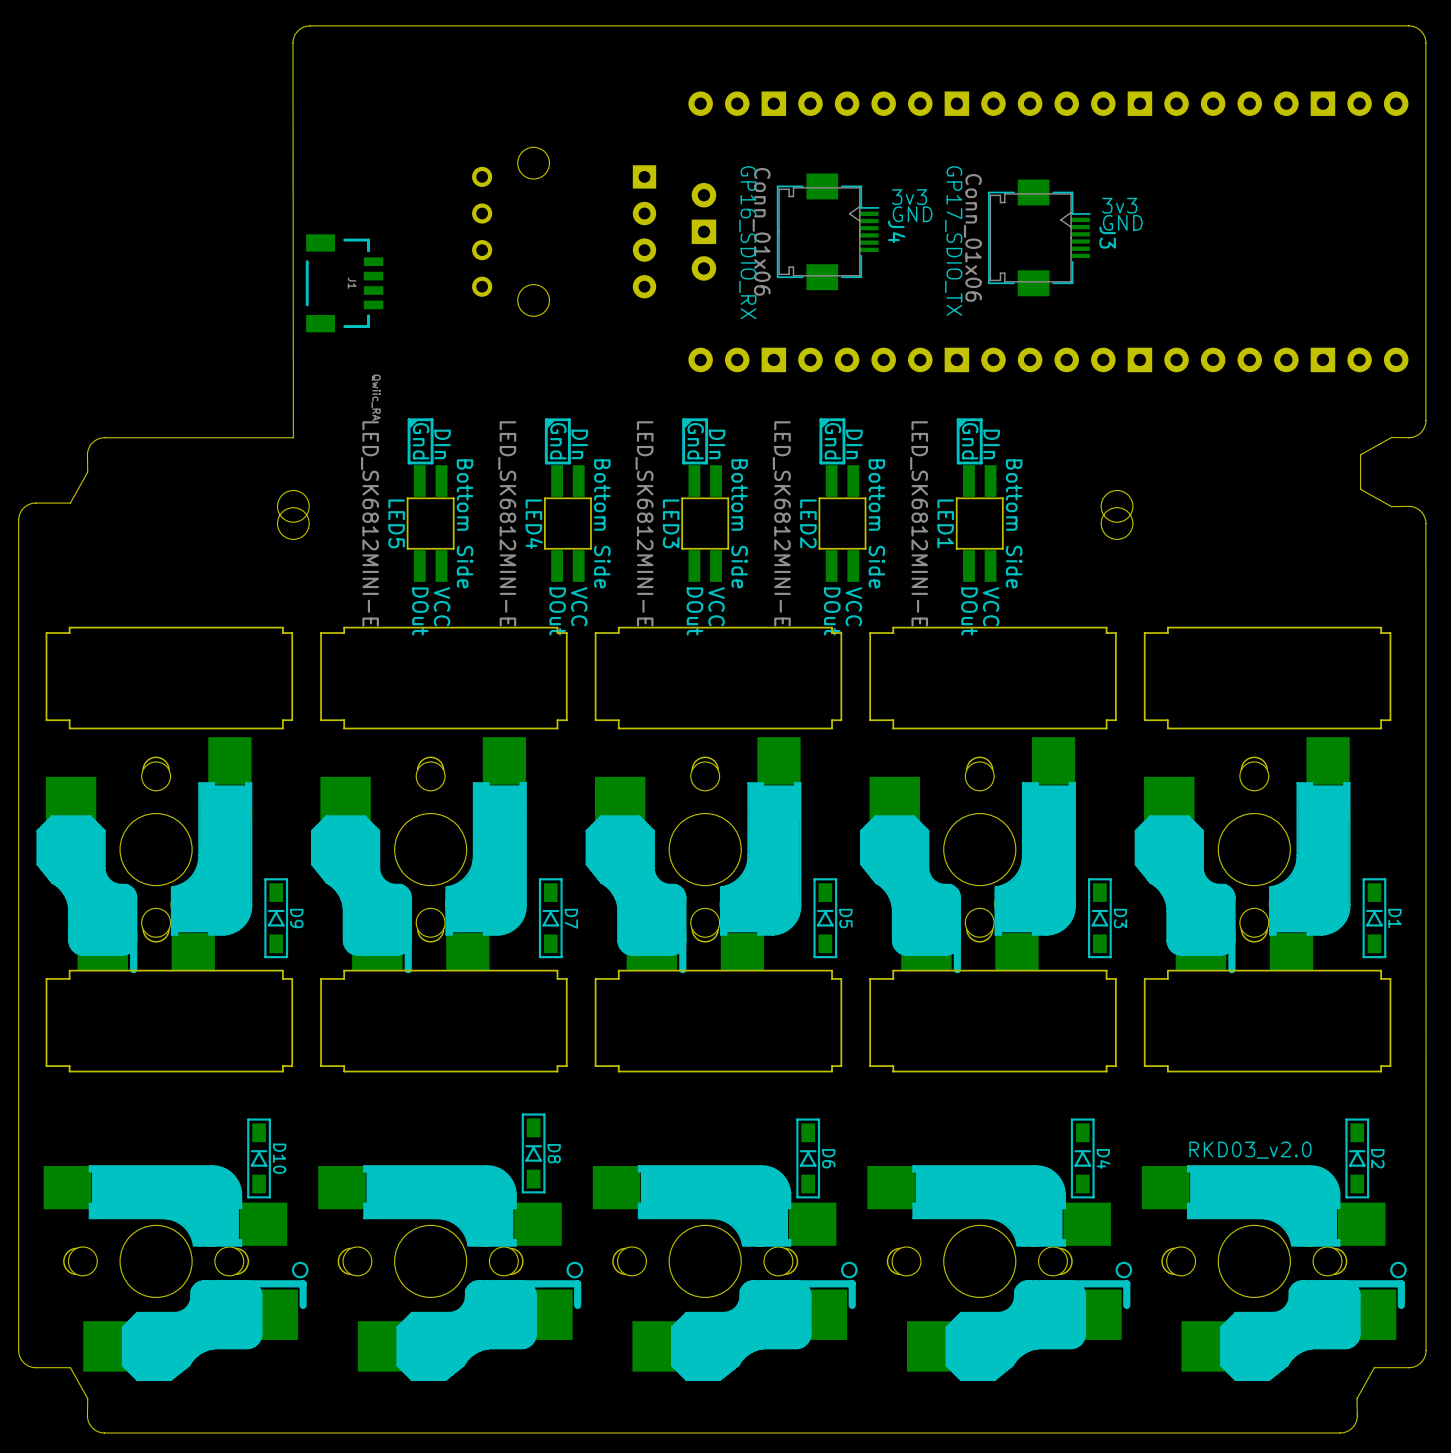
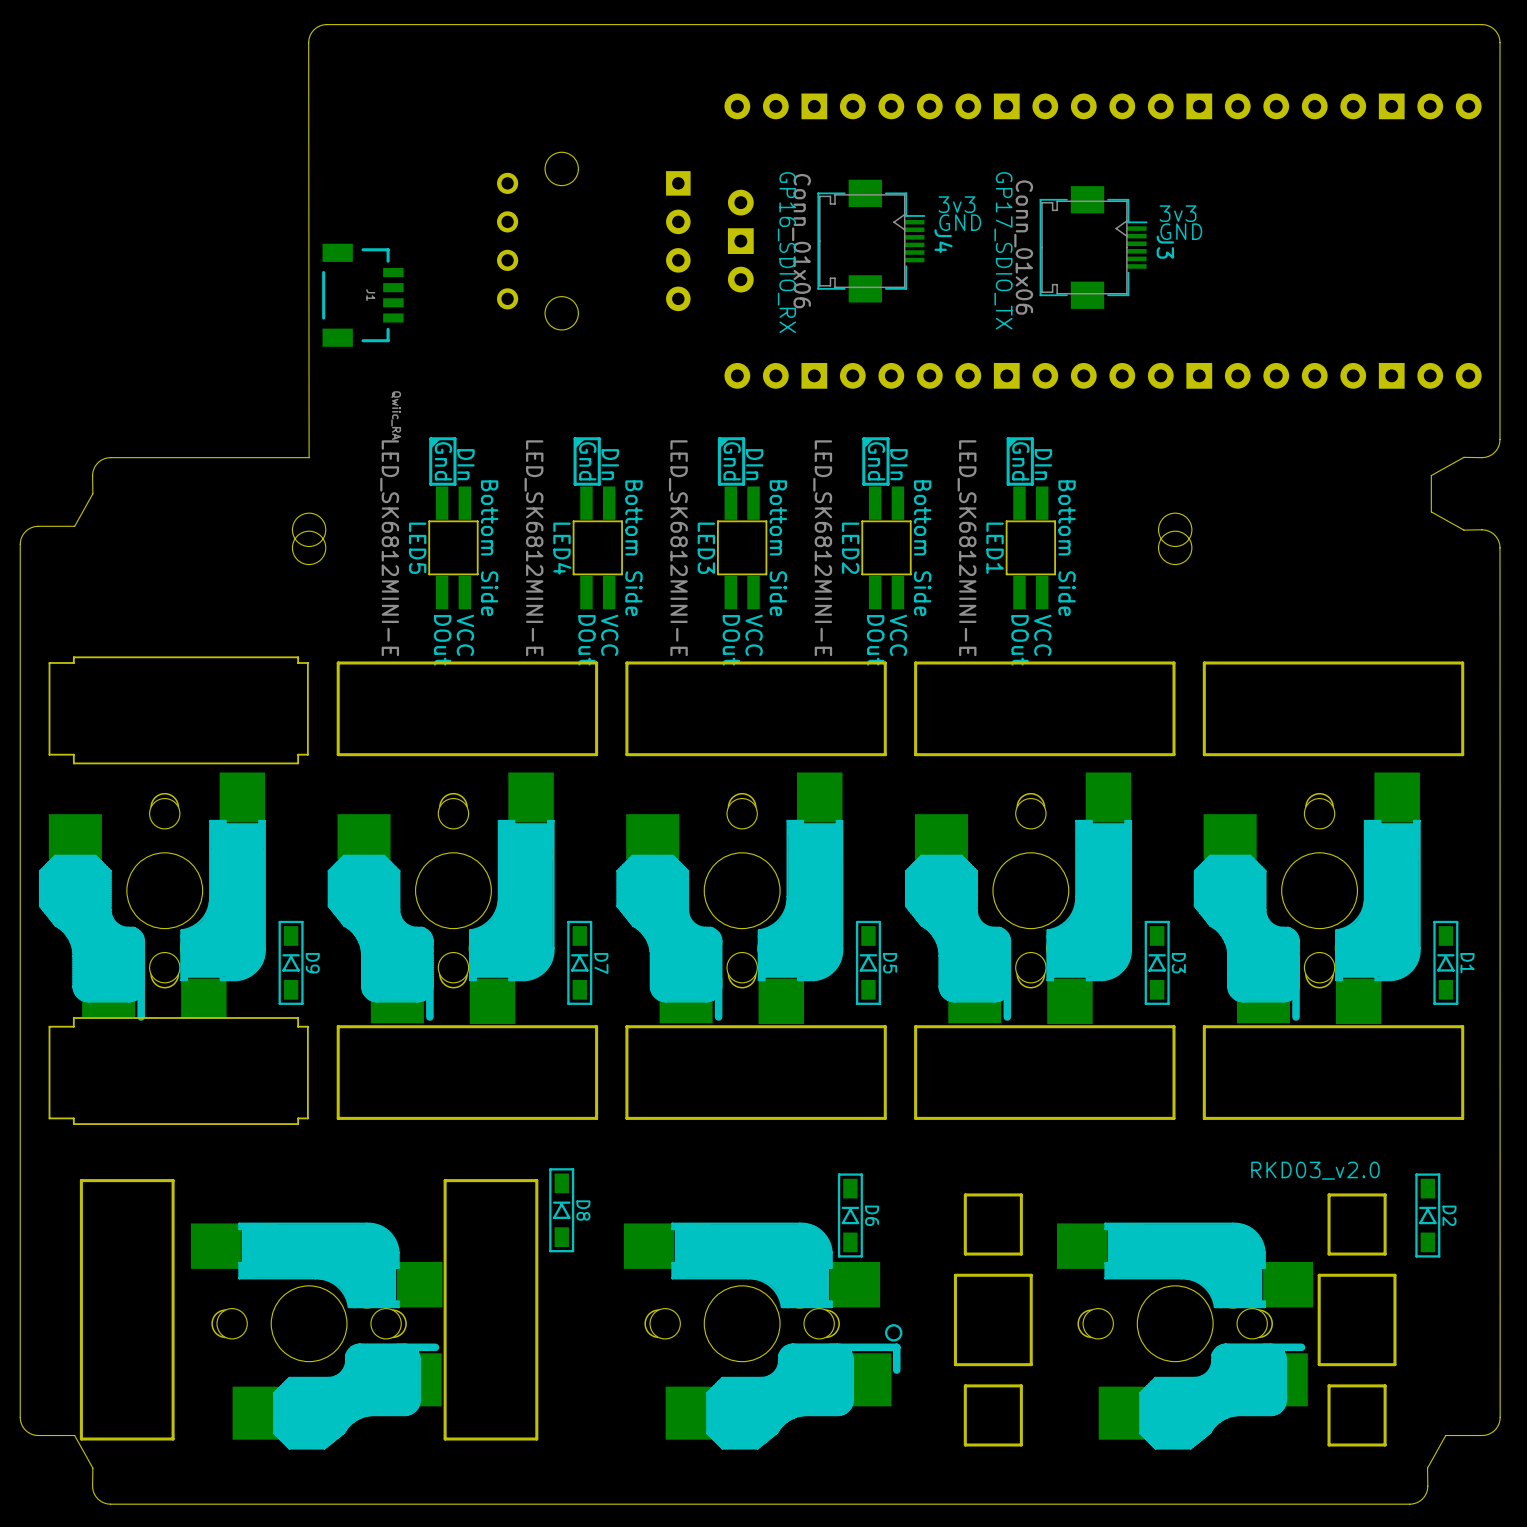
part footprint: [311, 626, 568, 1073] -> [327, 661, 599, 1120]
part footprint: [585, 626, 843, 1073] -> [616, 661, 887, 1120]
part footprint: [860, 626, 1117, 1073] -> [905, 661, 1176, 1120]
part footprint: [1134, 626, 1392, 1073] -> [1193, 661, 1465, 1120]
text position: RKD03_v2.0 (1250, 1150) -> RKD03_v2.0 (1315, 1170)
D10: (259, 1158) -> none
D4: (1082, 1158) -> none
part: none -> (309, 1314)
part: none -> (1175, 1321)
part: (176, 1273) -> none
part: (450, 1273) -> none
part: (999, 1273) -> none
part: (1274, 1273) -> none

